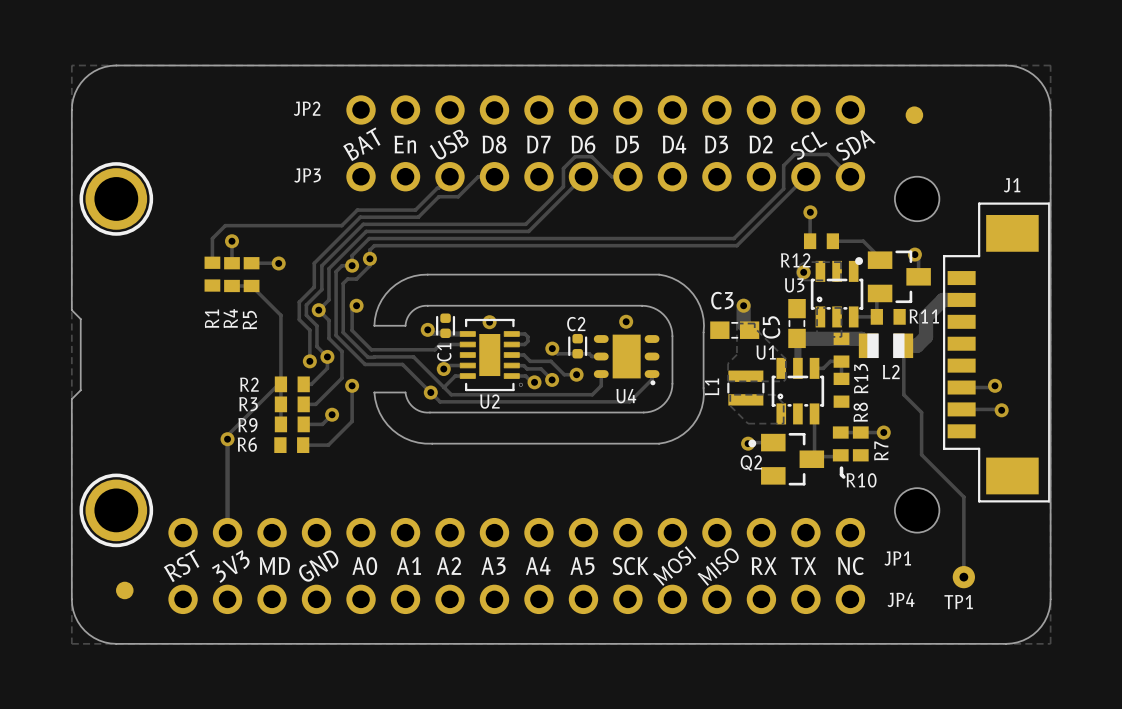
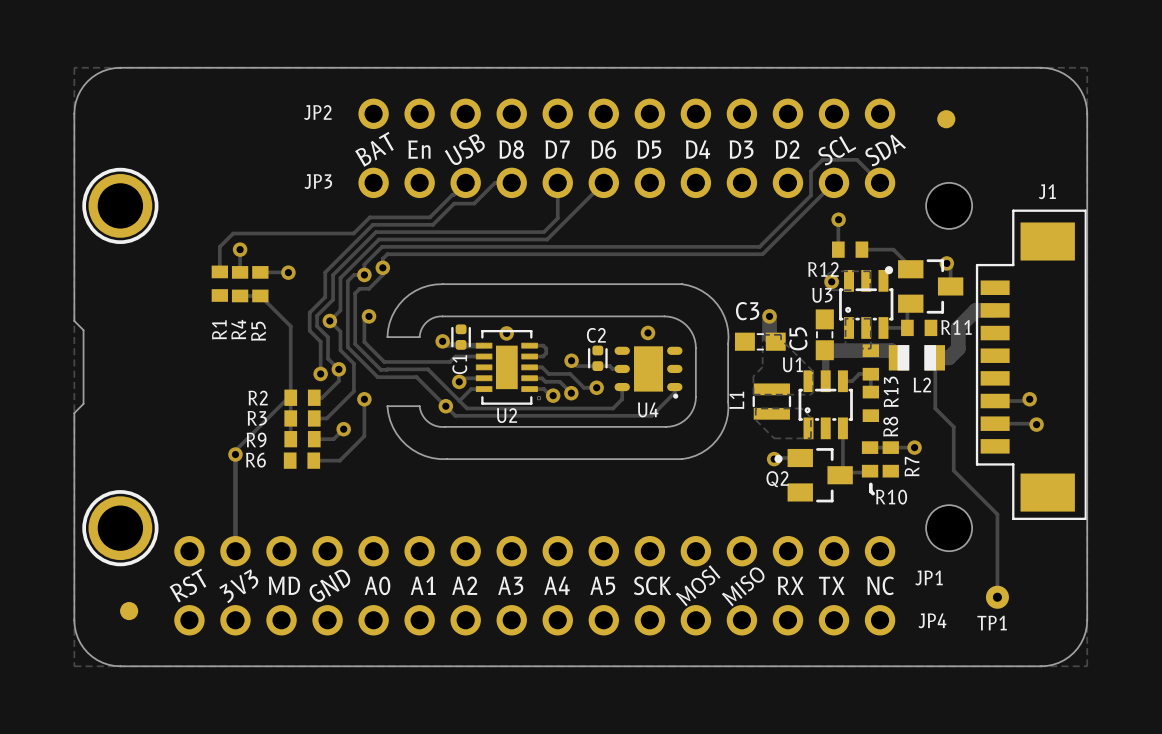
track: (627, 176) (611, 176) (591, 156) (575, 156) (563, 168) (563, 186) (525, 224) -> (557, 182) (557, 218) (543, 232)

